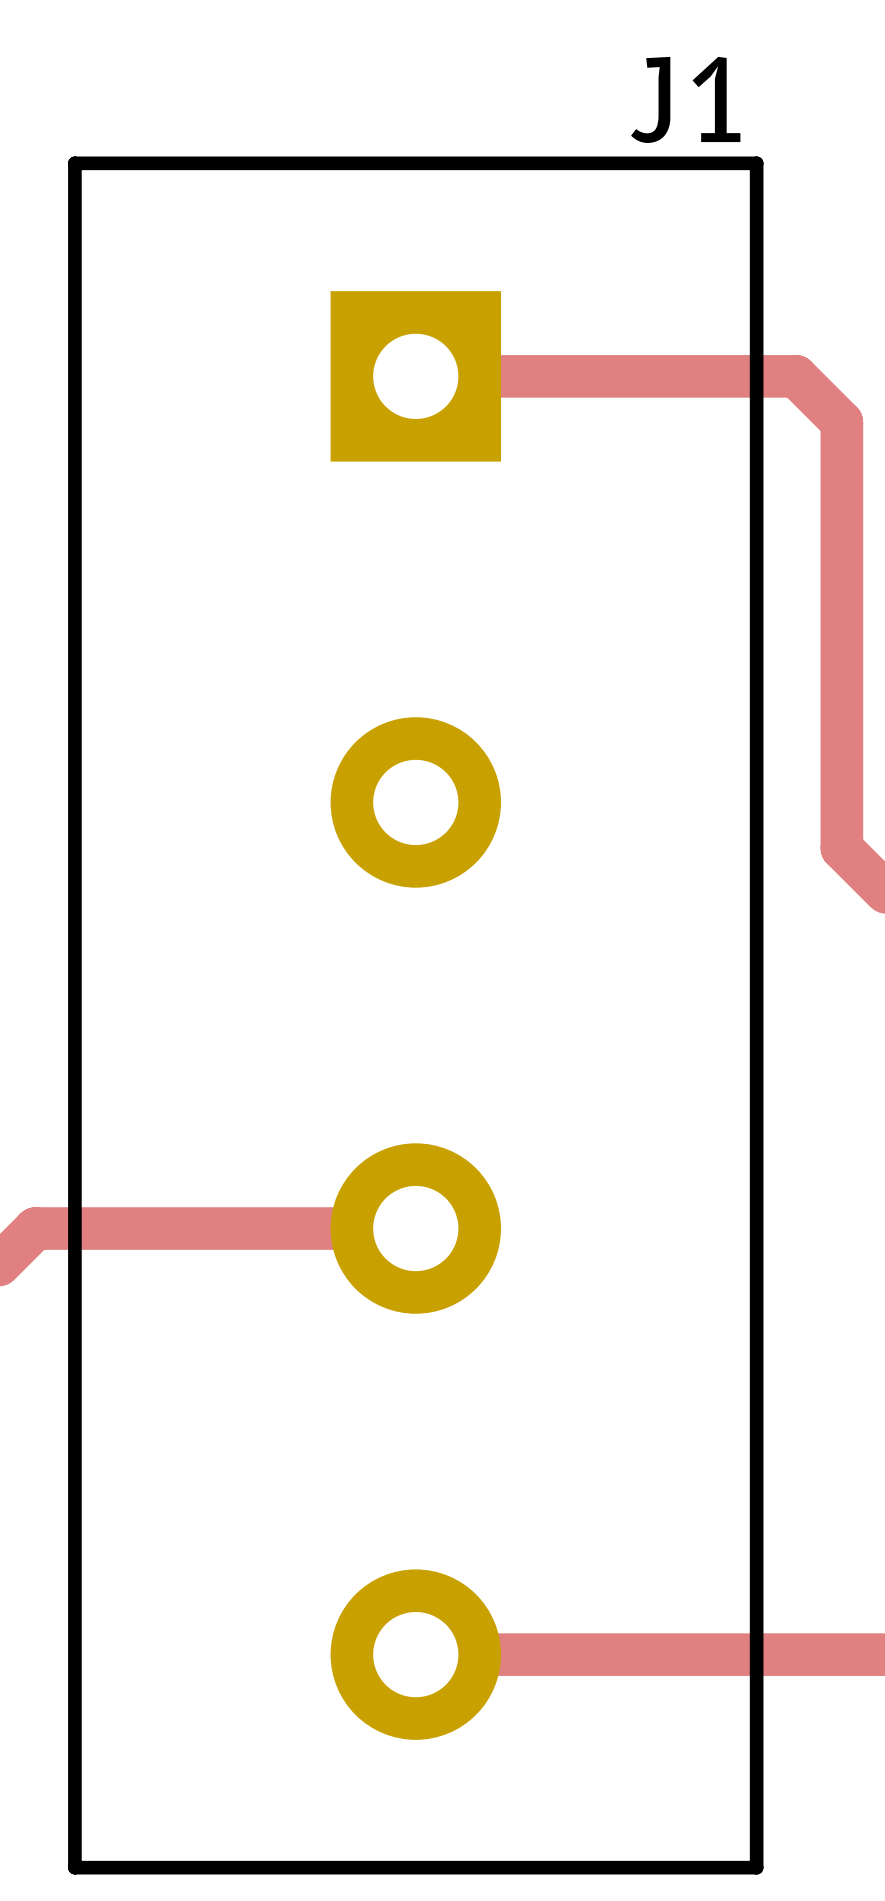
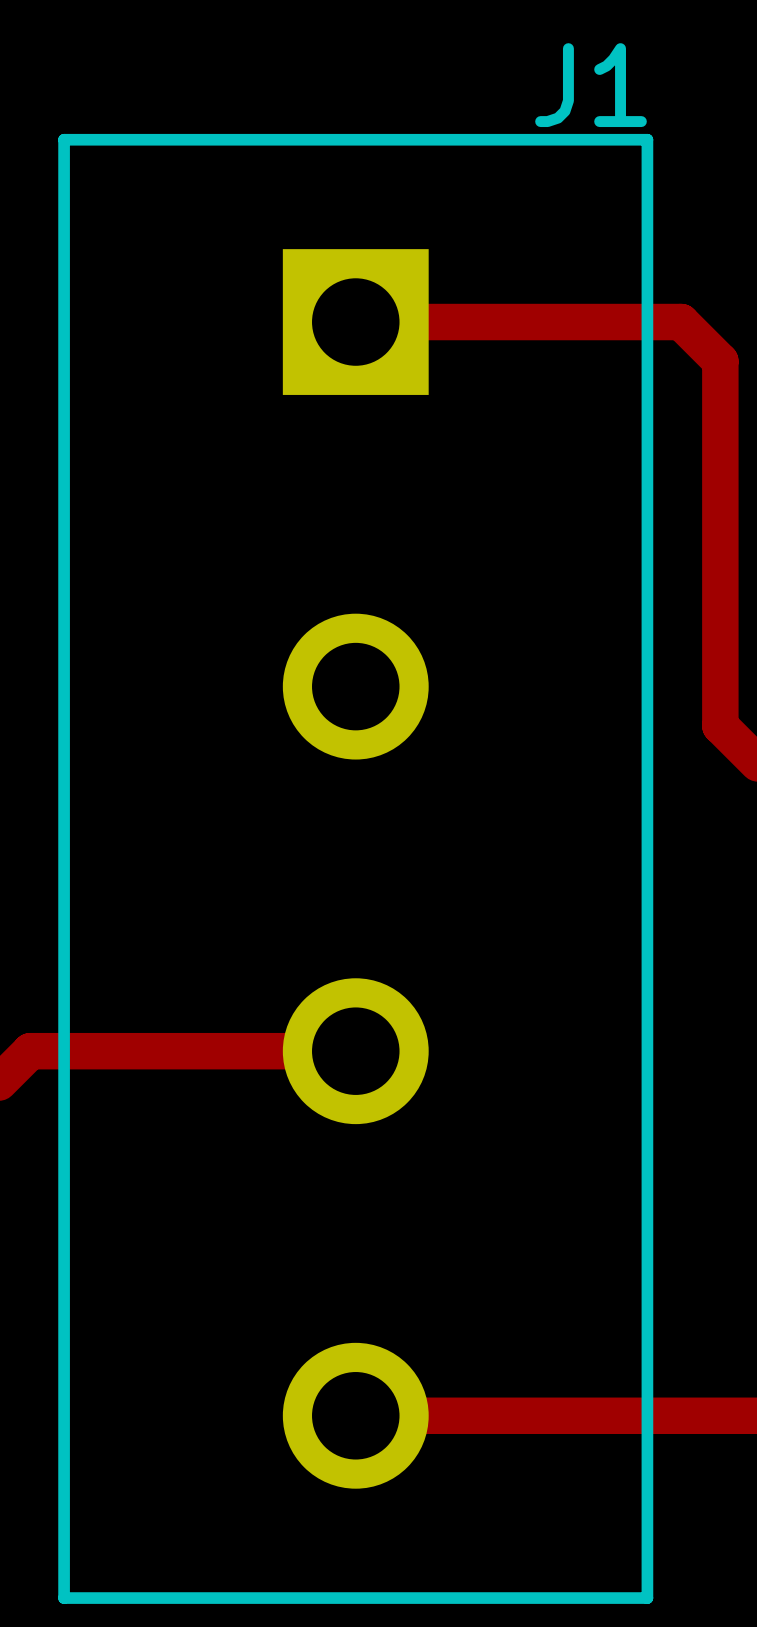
J1 footprint: [68, 156, 764, 1875] -> [58, 133, 654, 1604]

